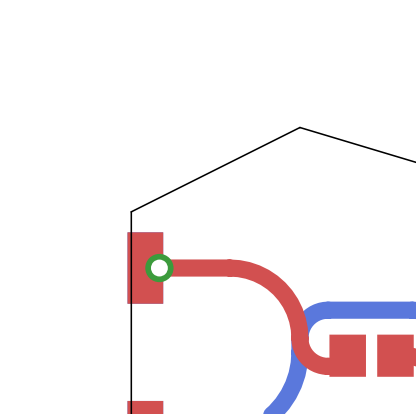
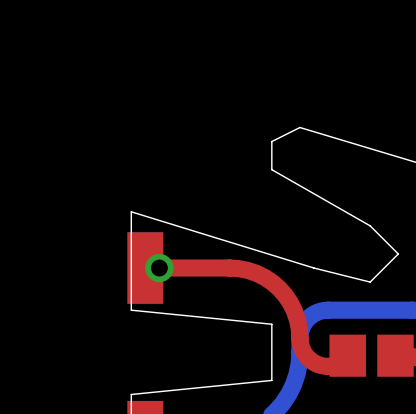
board edge: (271, 141) (131, 211) -> (271, 141) (271, 169) (370, 225) (398, 253) (370, 282) (313, 268) (131, 211)
board edge: (131, 310) (131, 394) -> (131, 310) (271, 324) (271, 380) (131, 394)

